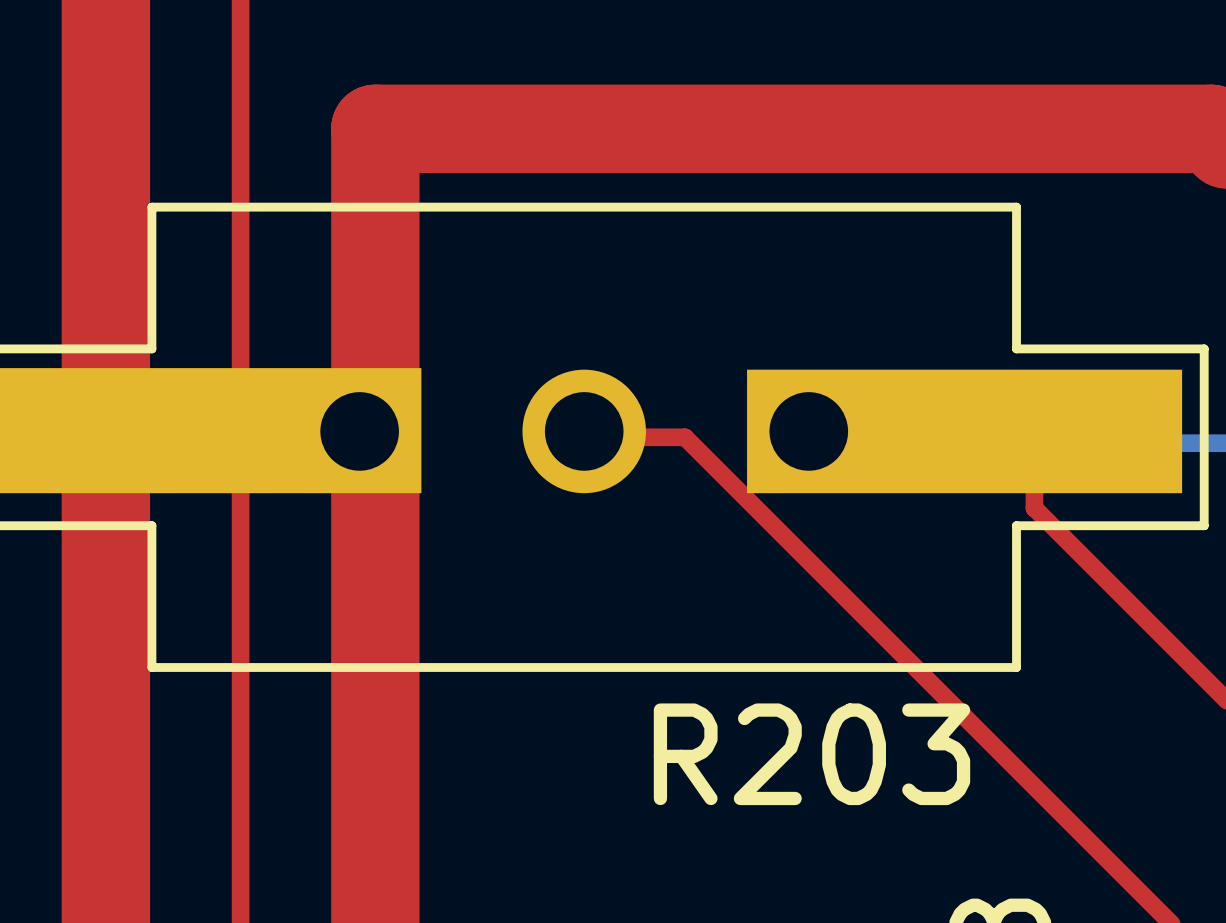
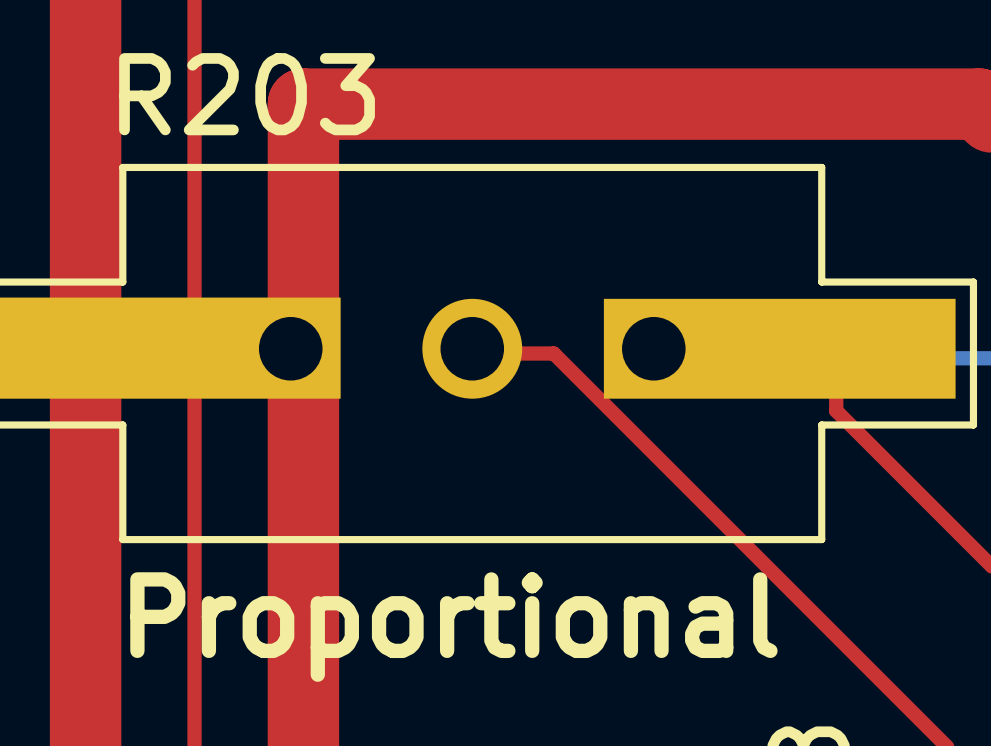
R203 name position: R203 (811, 754) -> R203 (247, 94)
text: none -> Proportional (453, 627)

